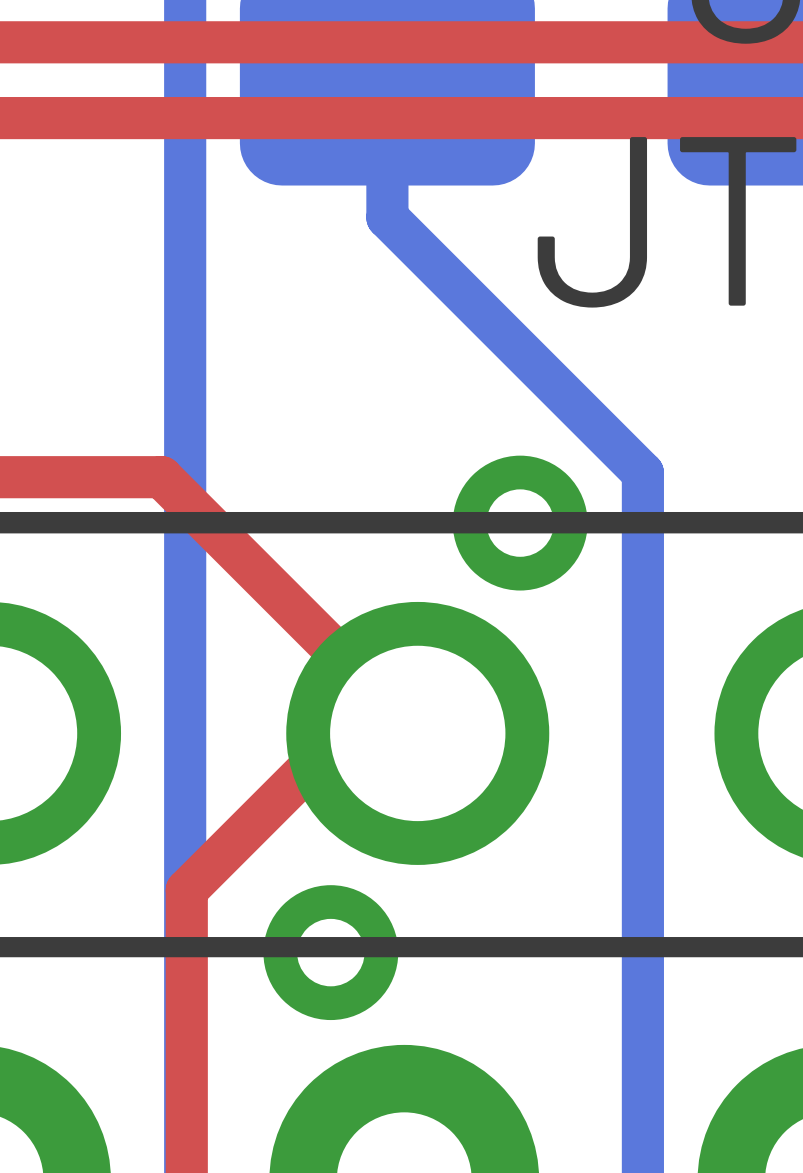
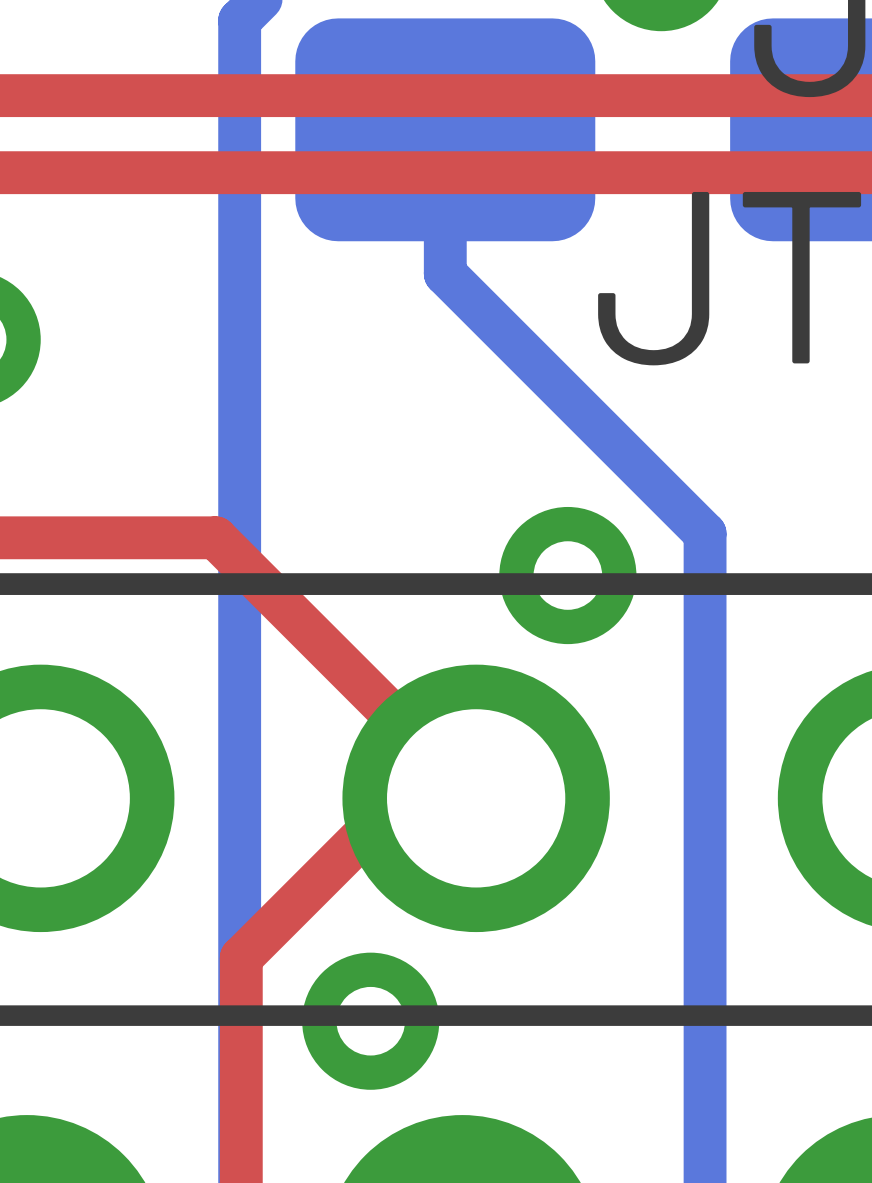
via position: (520, 523) -> (567, 575)
via position: (330, 952) -> (370, 1021)

